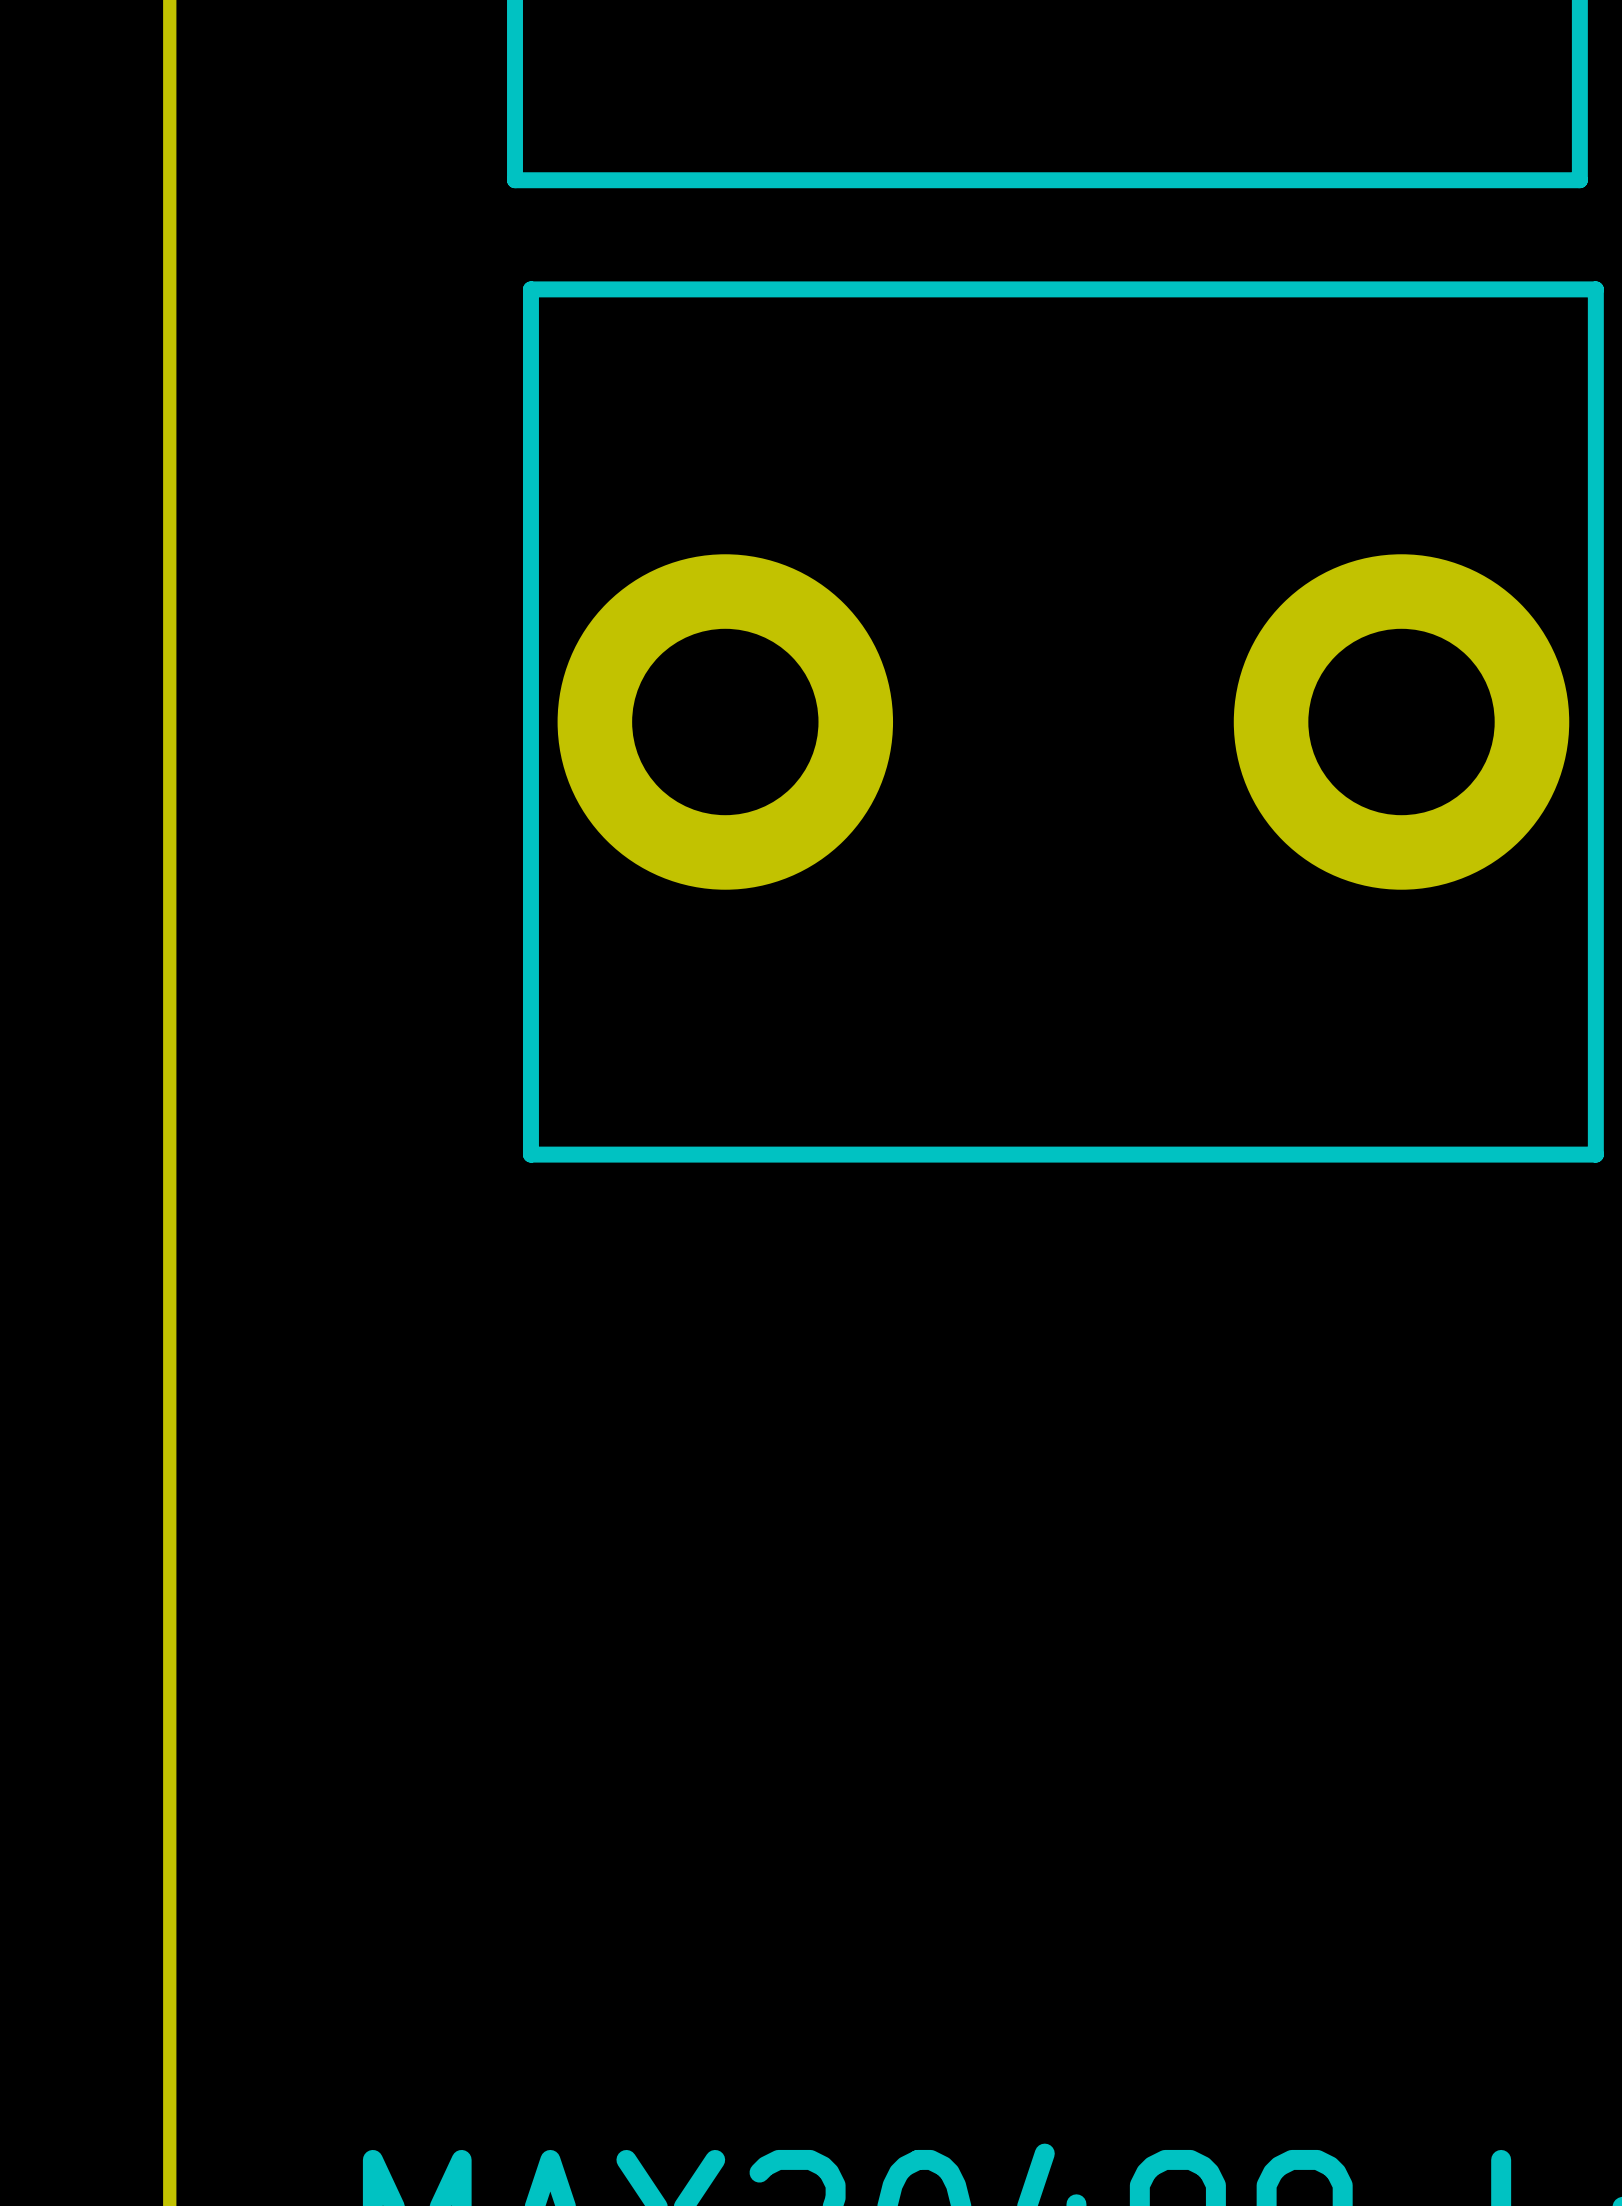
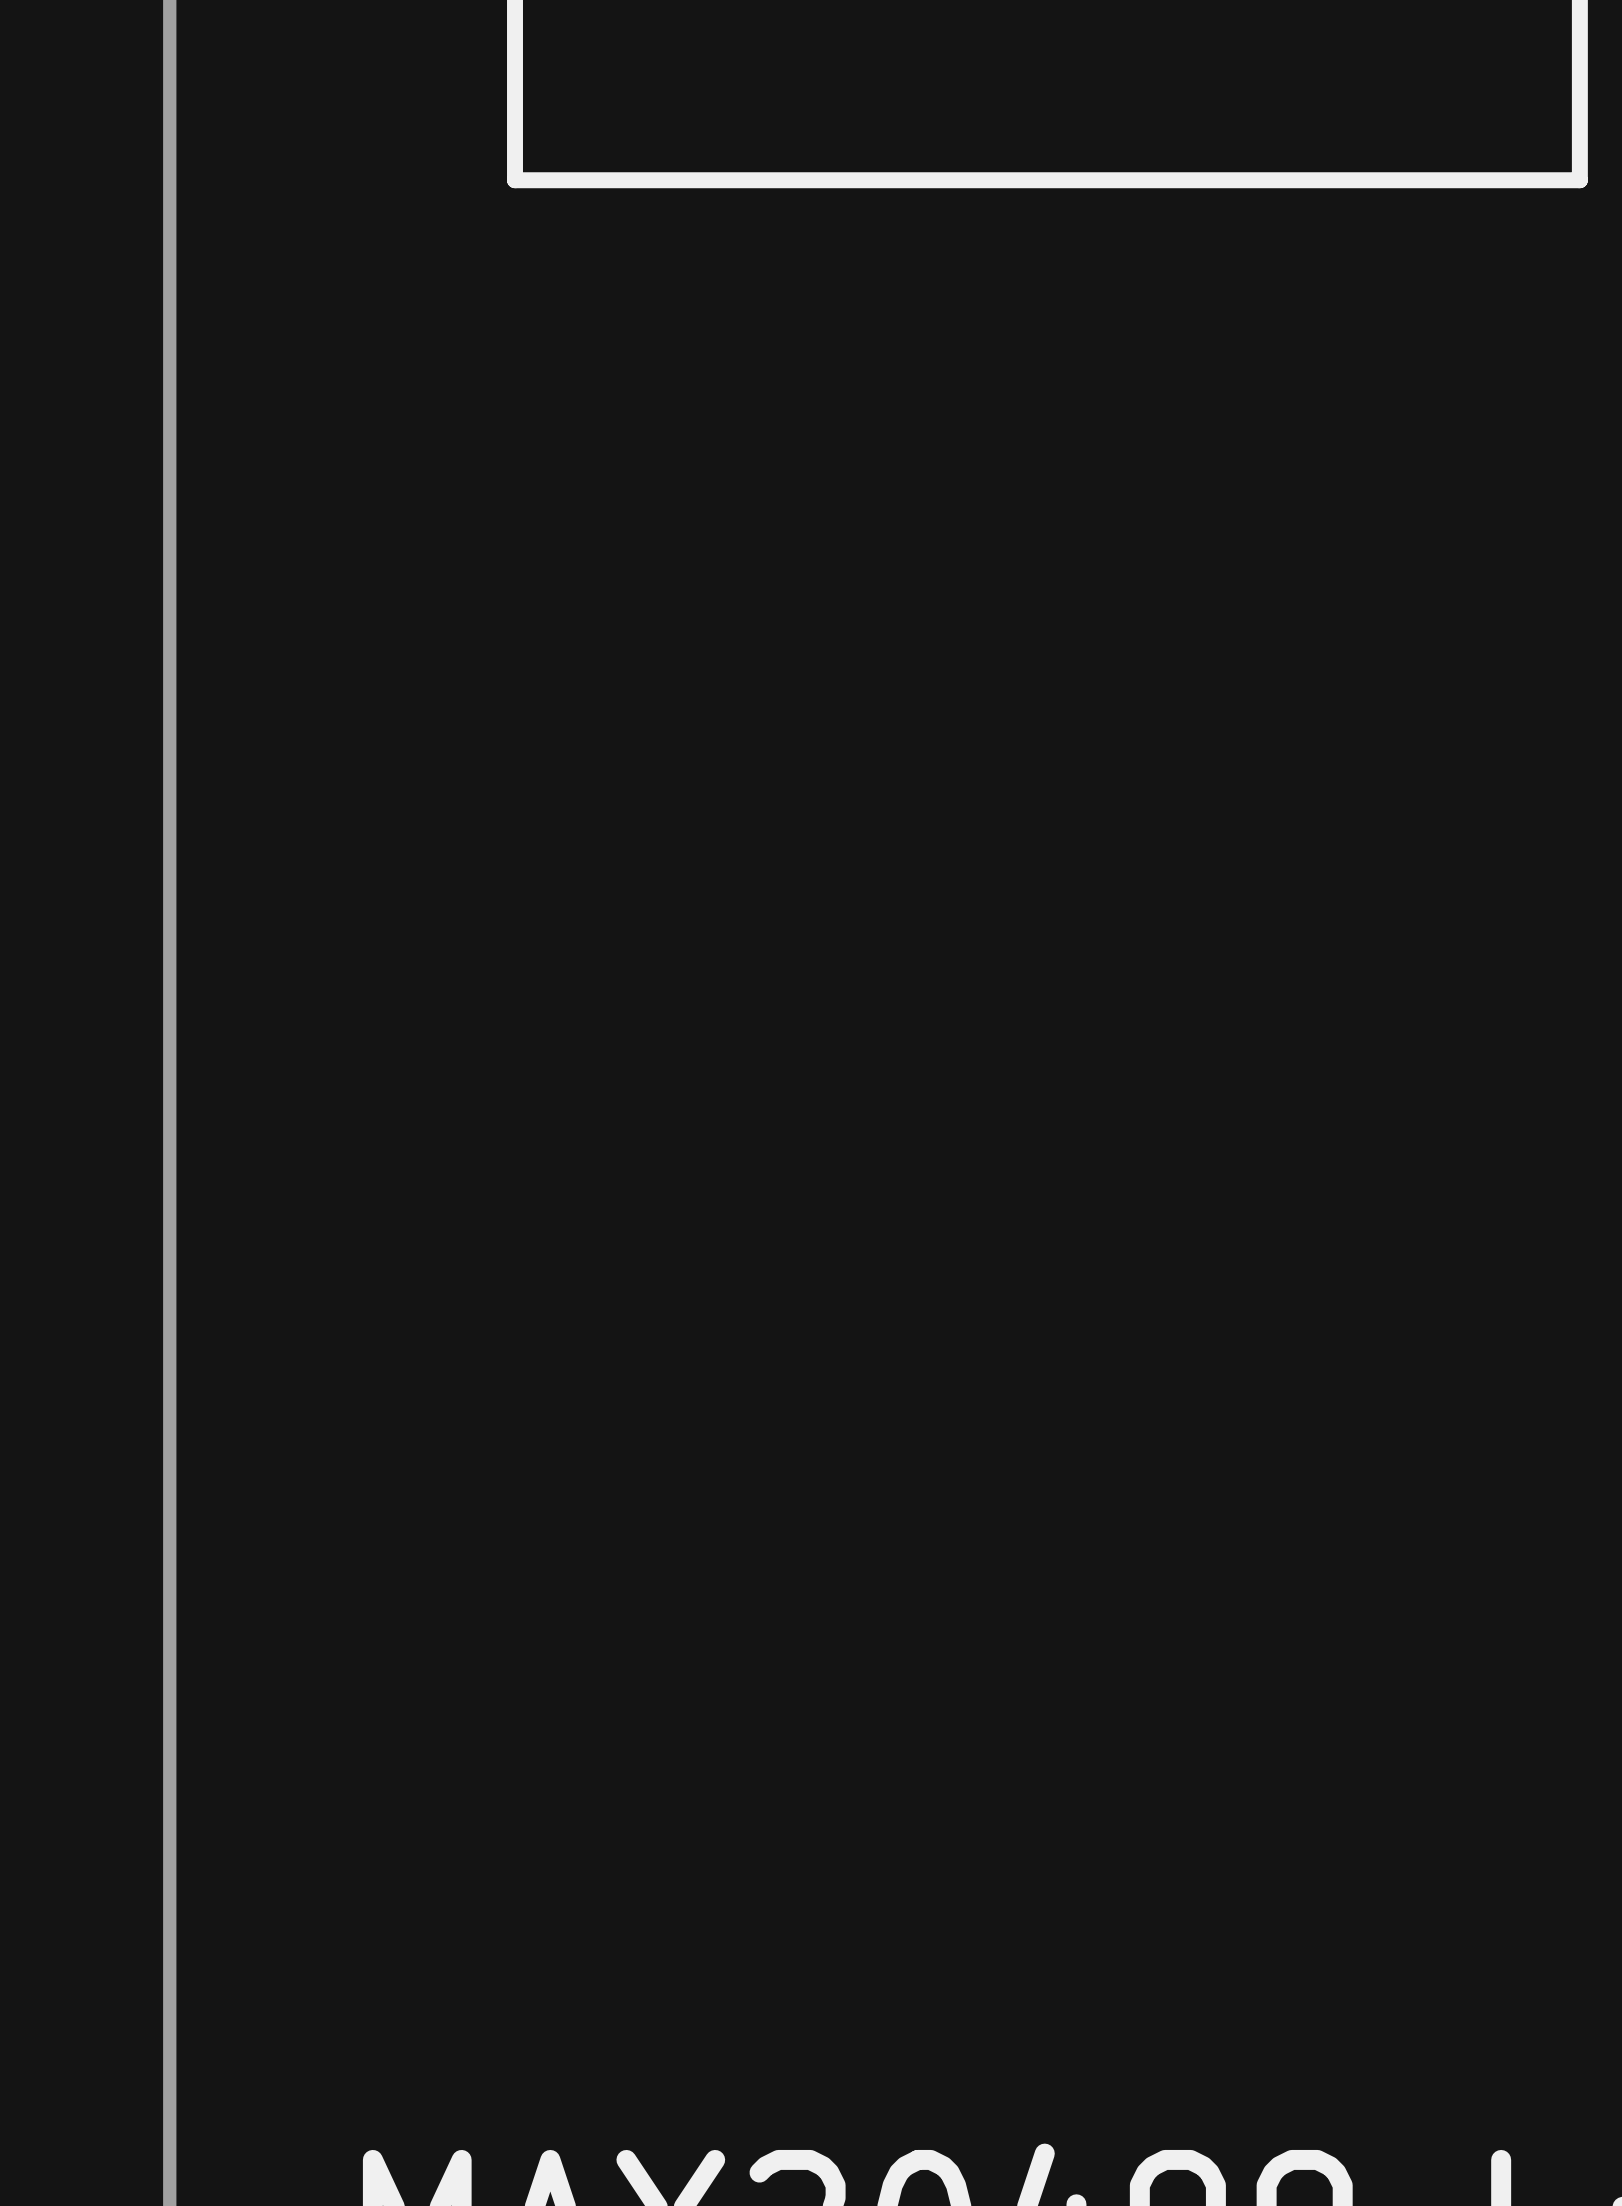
part: (1063, 721) -> none

